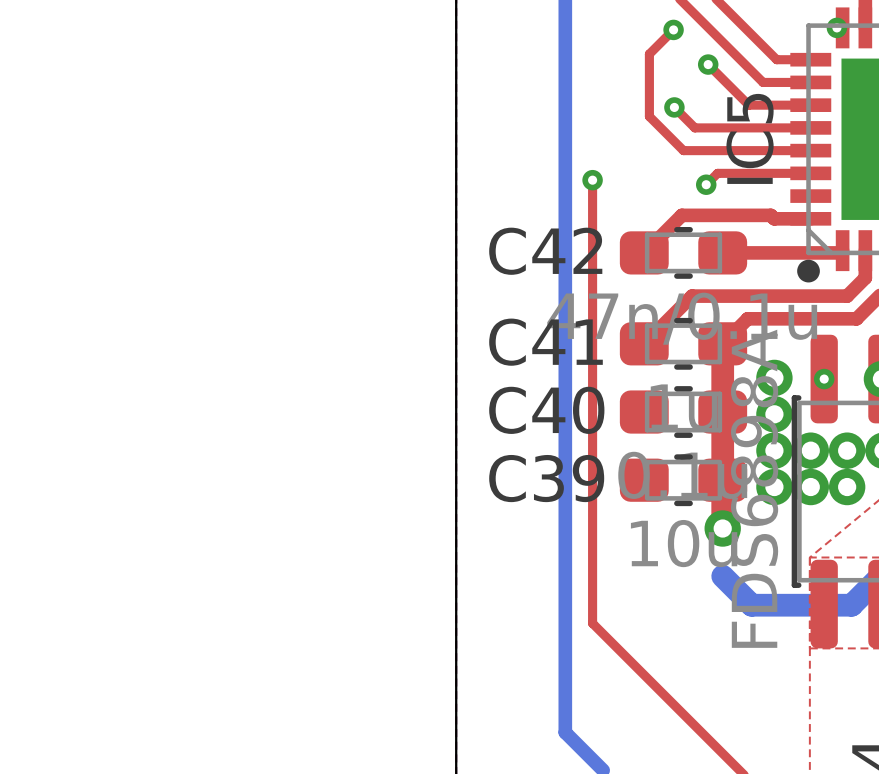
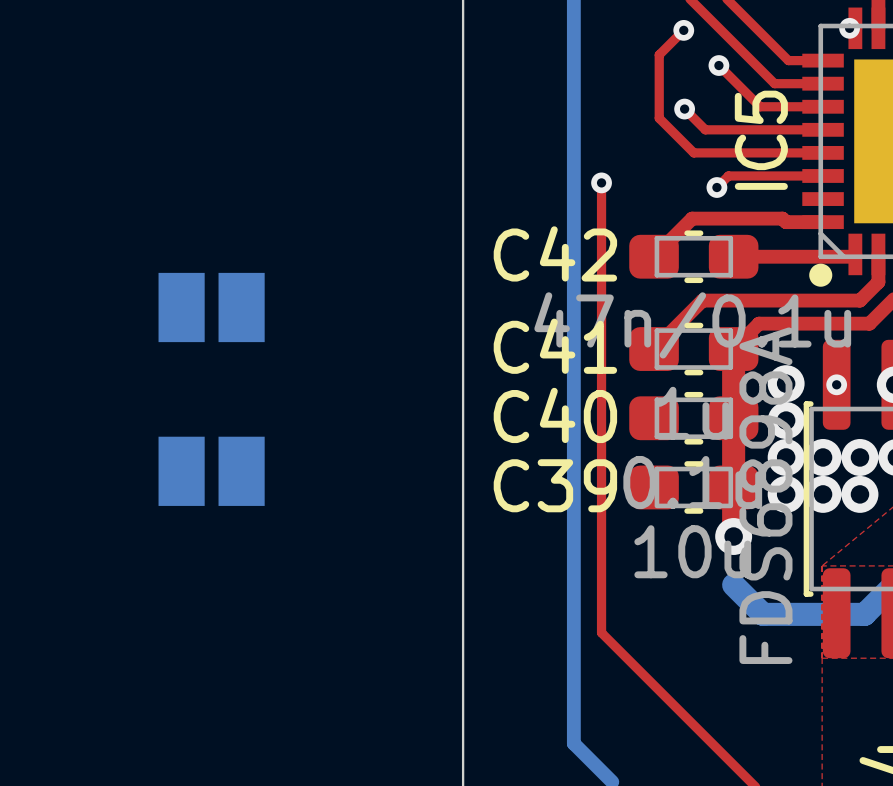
part: none -> (211, 307)
part: none -> (211, 471)

